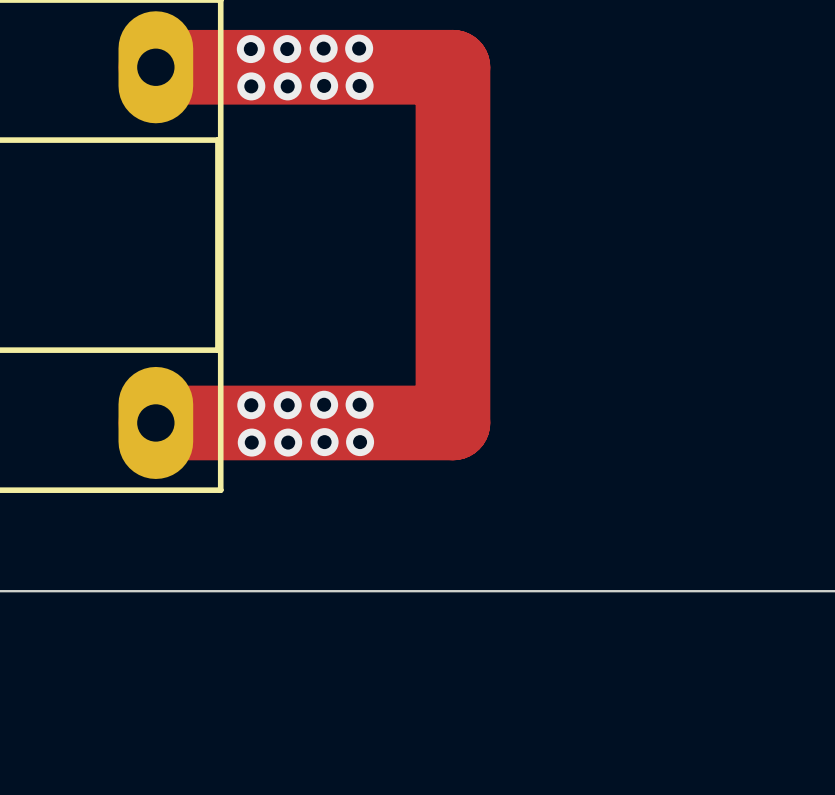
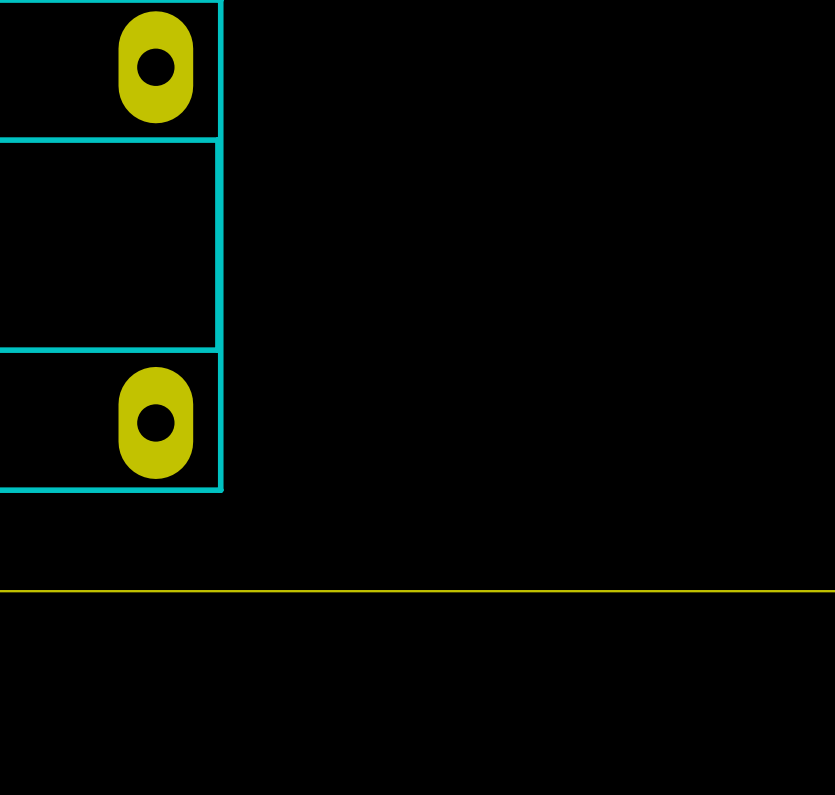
via: (323, 48) -> none
via: (359, 48) -> none
via: (250, 49) -> none
via: (287, 49) -> none
track: (155, 67) (452, 67) (452, 422) (155, 422) -> none
via: (324, 85) -> none
via: (359, 85) -> none
via: (251, 86) -> none
via: (287, 86) -> none
via: (324, 404) -> none
via: (359, 404) -> none
via: (251, 405) -> none
via: (287, 405) -> none
via: (251, 442) -> none
via: (288, 442) -> none
via: (324, 442) -> none
via: (360, 442) -> none

